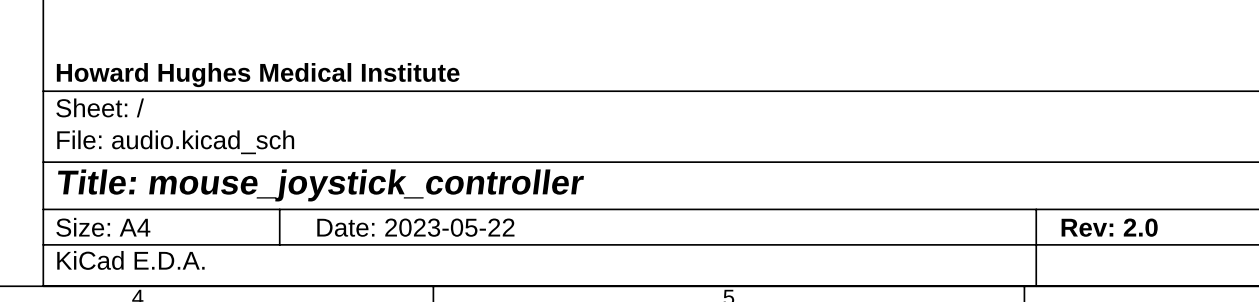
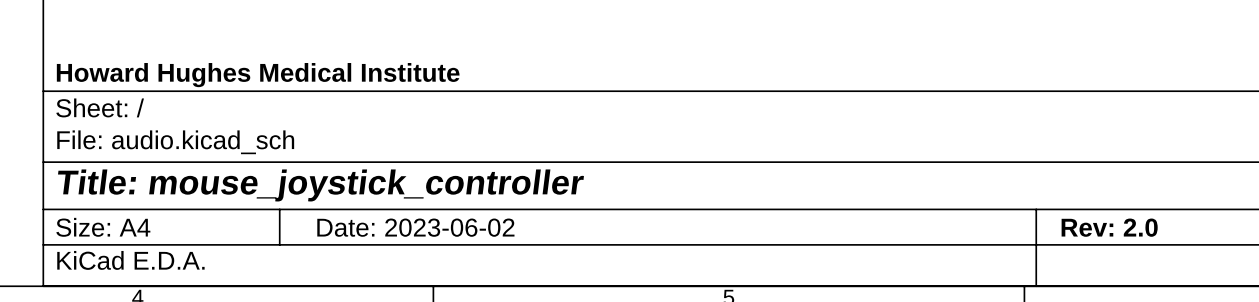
title block: Date: 2023-05-22 (415, 227) -> Date: 2023-06-02 (415, 227)

